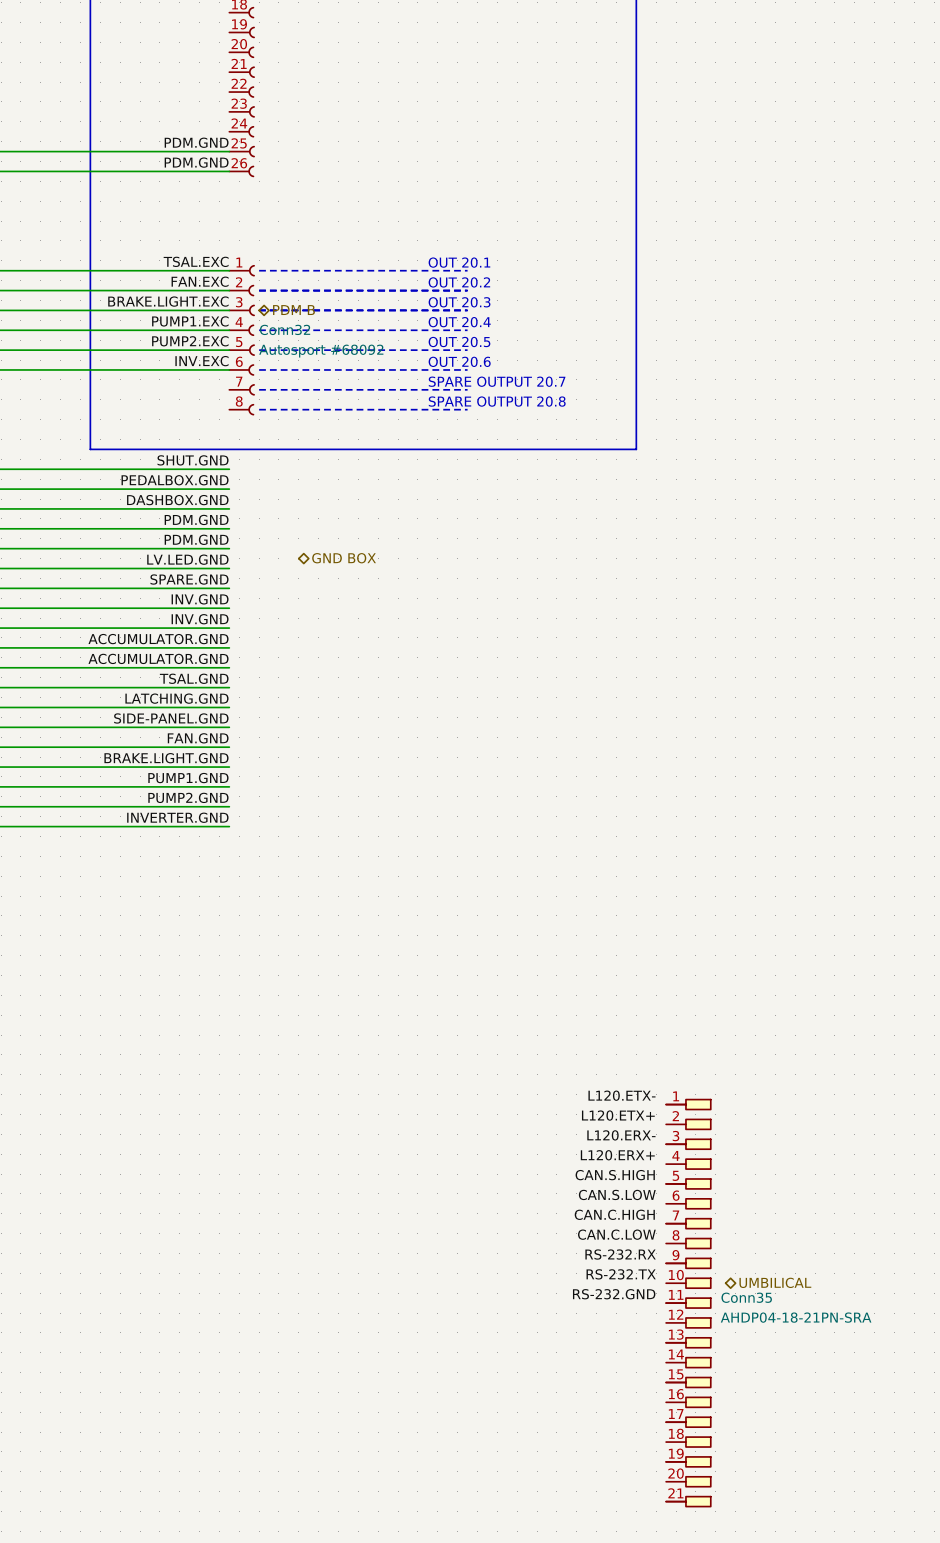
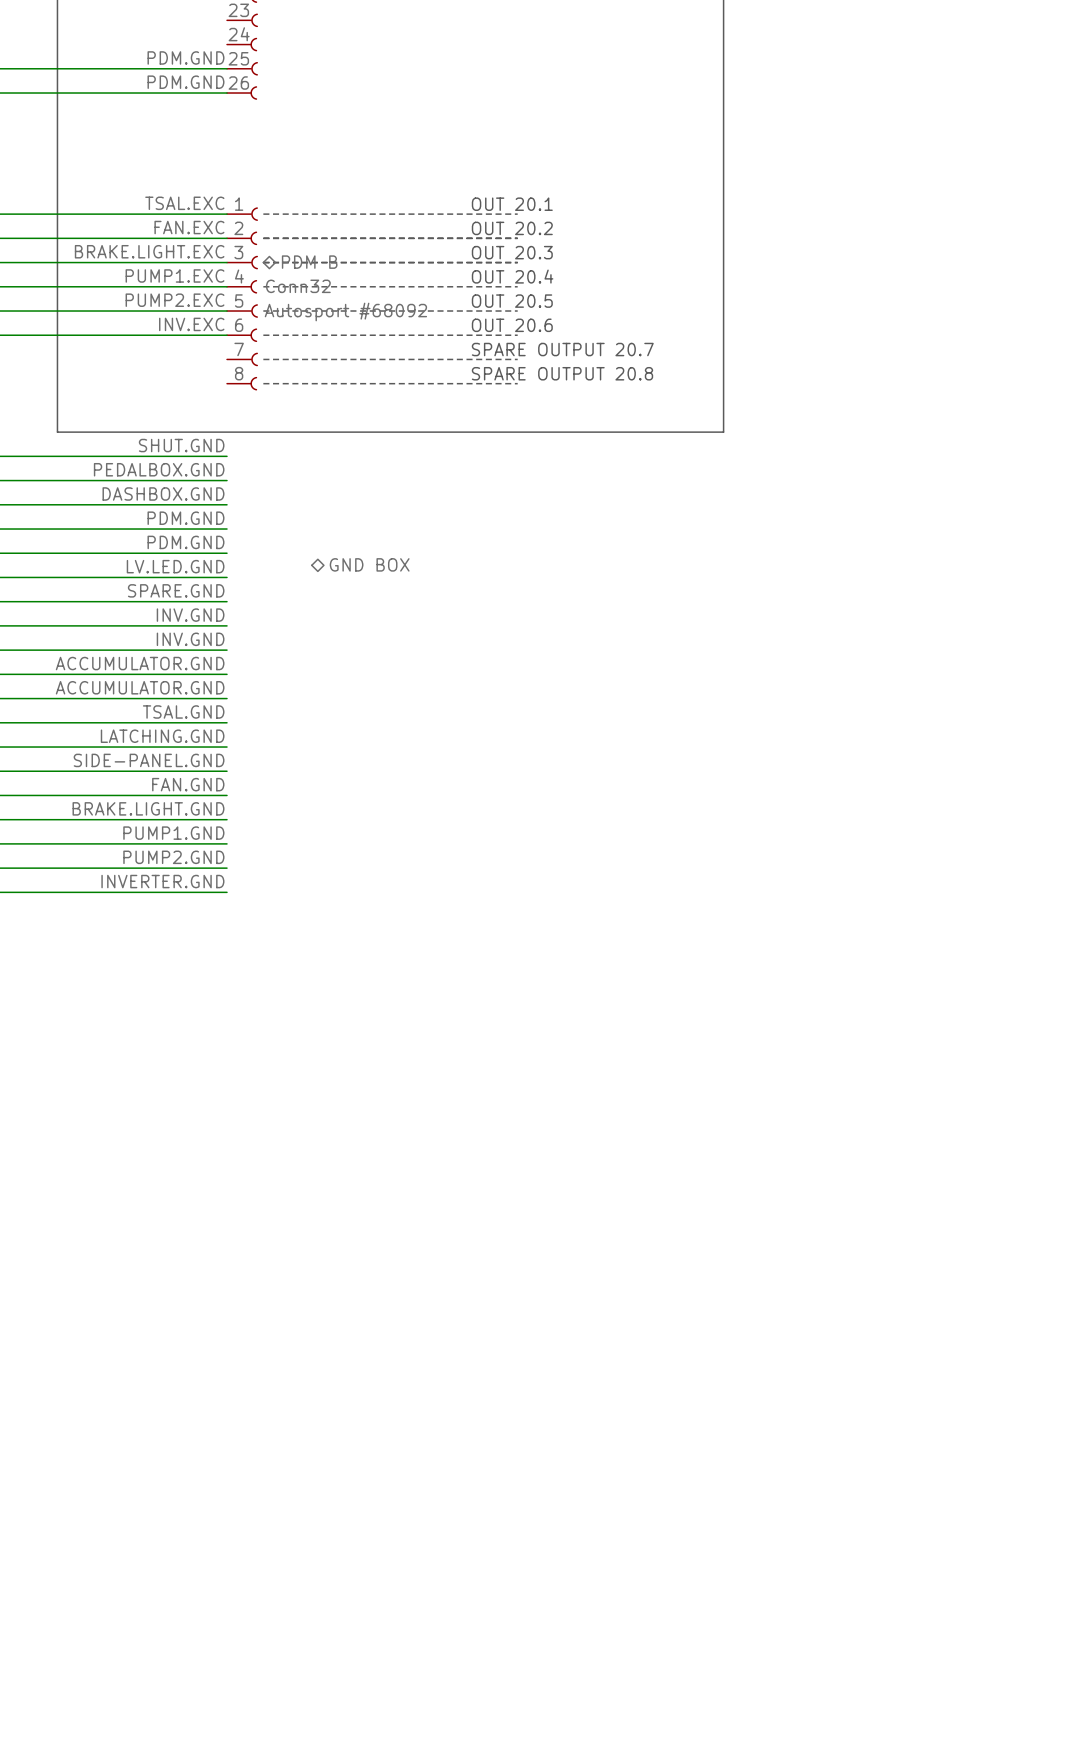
label: L120.ETX- (621, 1095) -> none
label: L120.ETX+ (618, 1115) -> none
label: L120.ERX- (621, 1135) -> none
label: L120.ERX+ (617, 1155) -> none
label: CAN.S.HIGH (615, 1175) -> none
label: CAN.S.LOW (617, 1194) -> none
label: CAN.C.HIGH (614, 1214) -> none
label: CAN.C.LOW (616, 1234) -> none
label: RS-232.RX (620, 1254) -> none
label: RS-232.TX (621, 1274) -> none
hierarchical label: UMBILICAL (775, 1282) -> none
label: RS-232.GND (614, 1294) -> none
Conn35: (688, 1303) -> none

